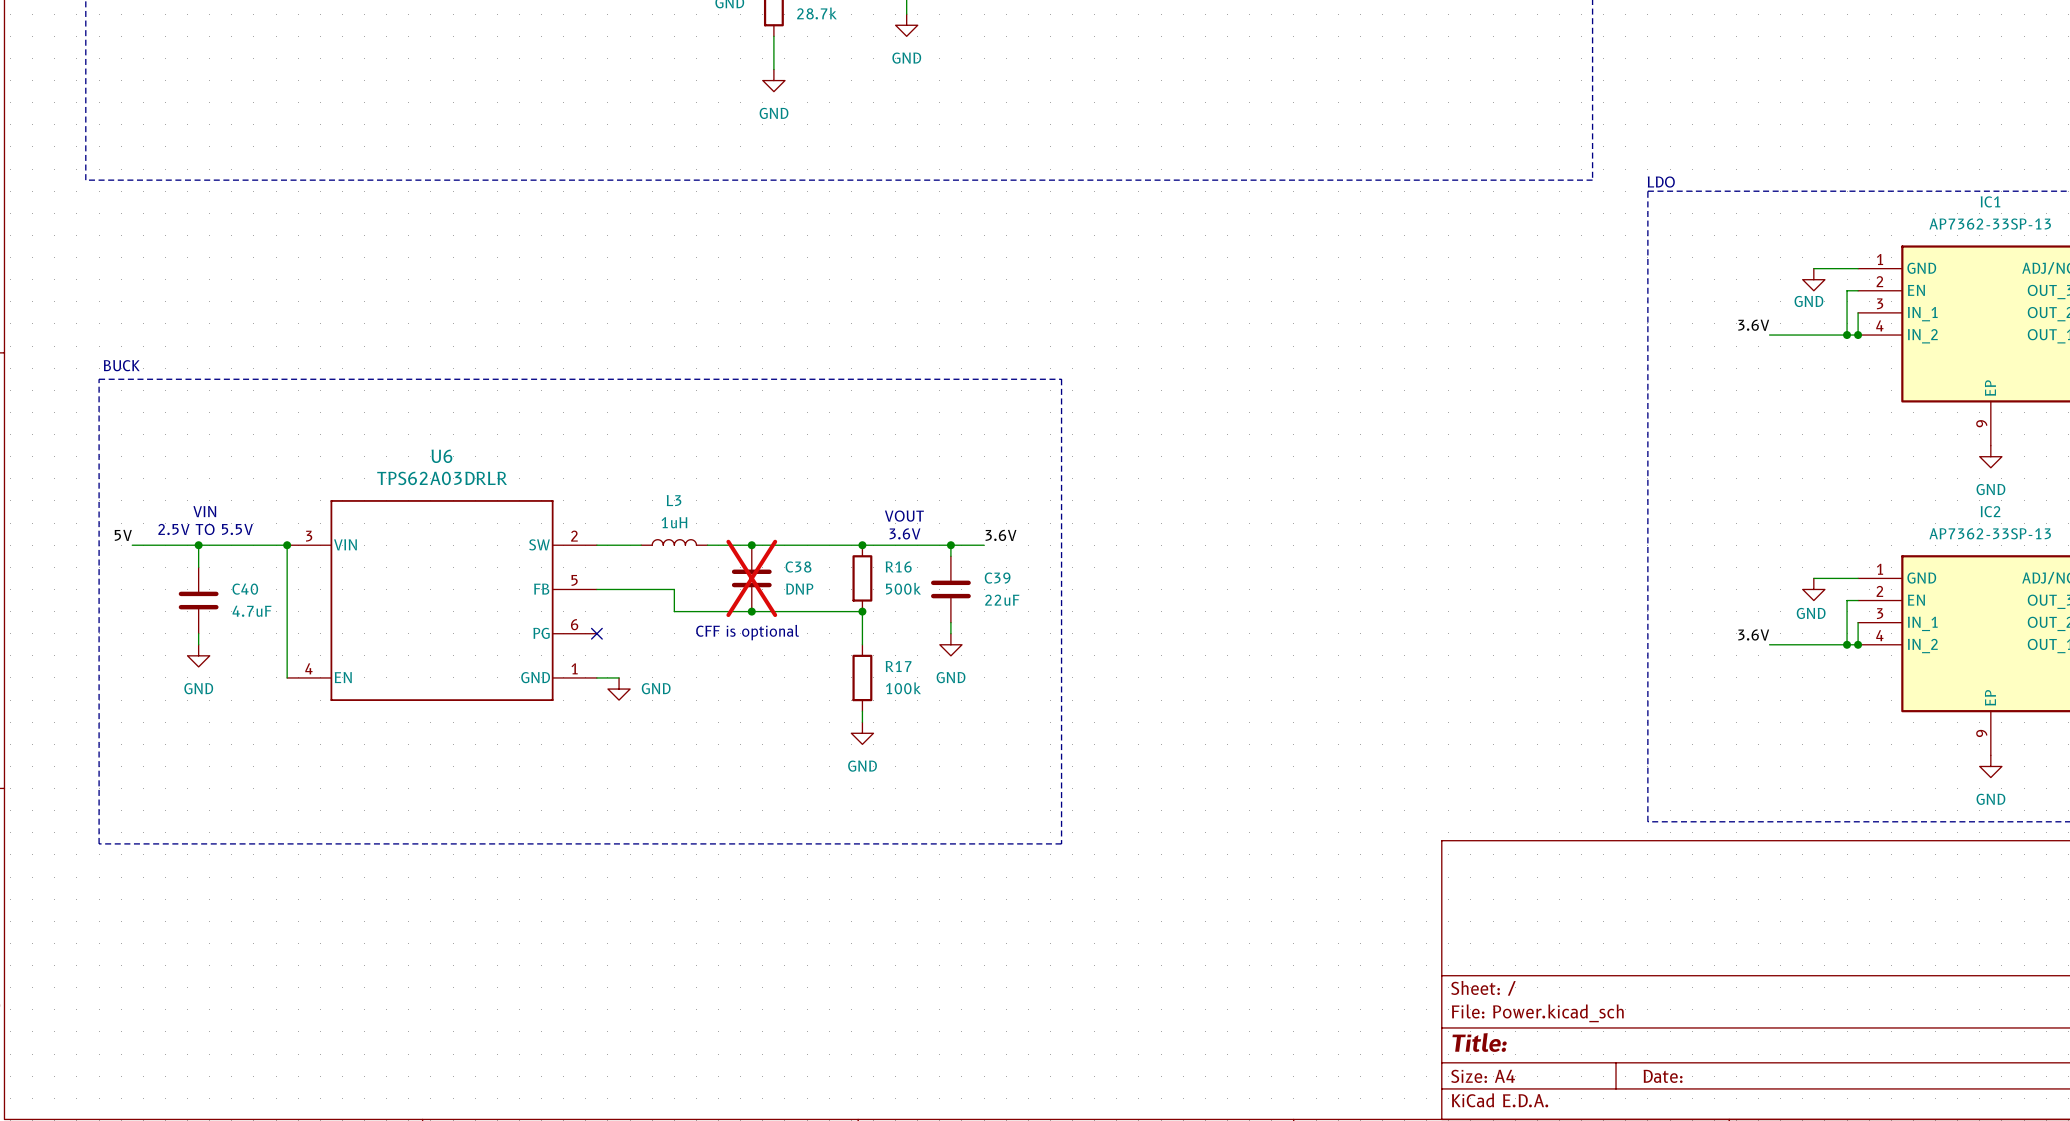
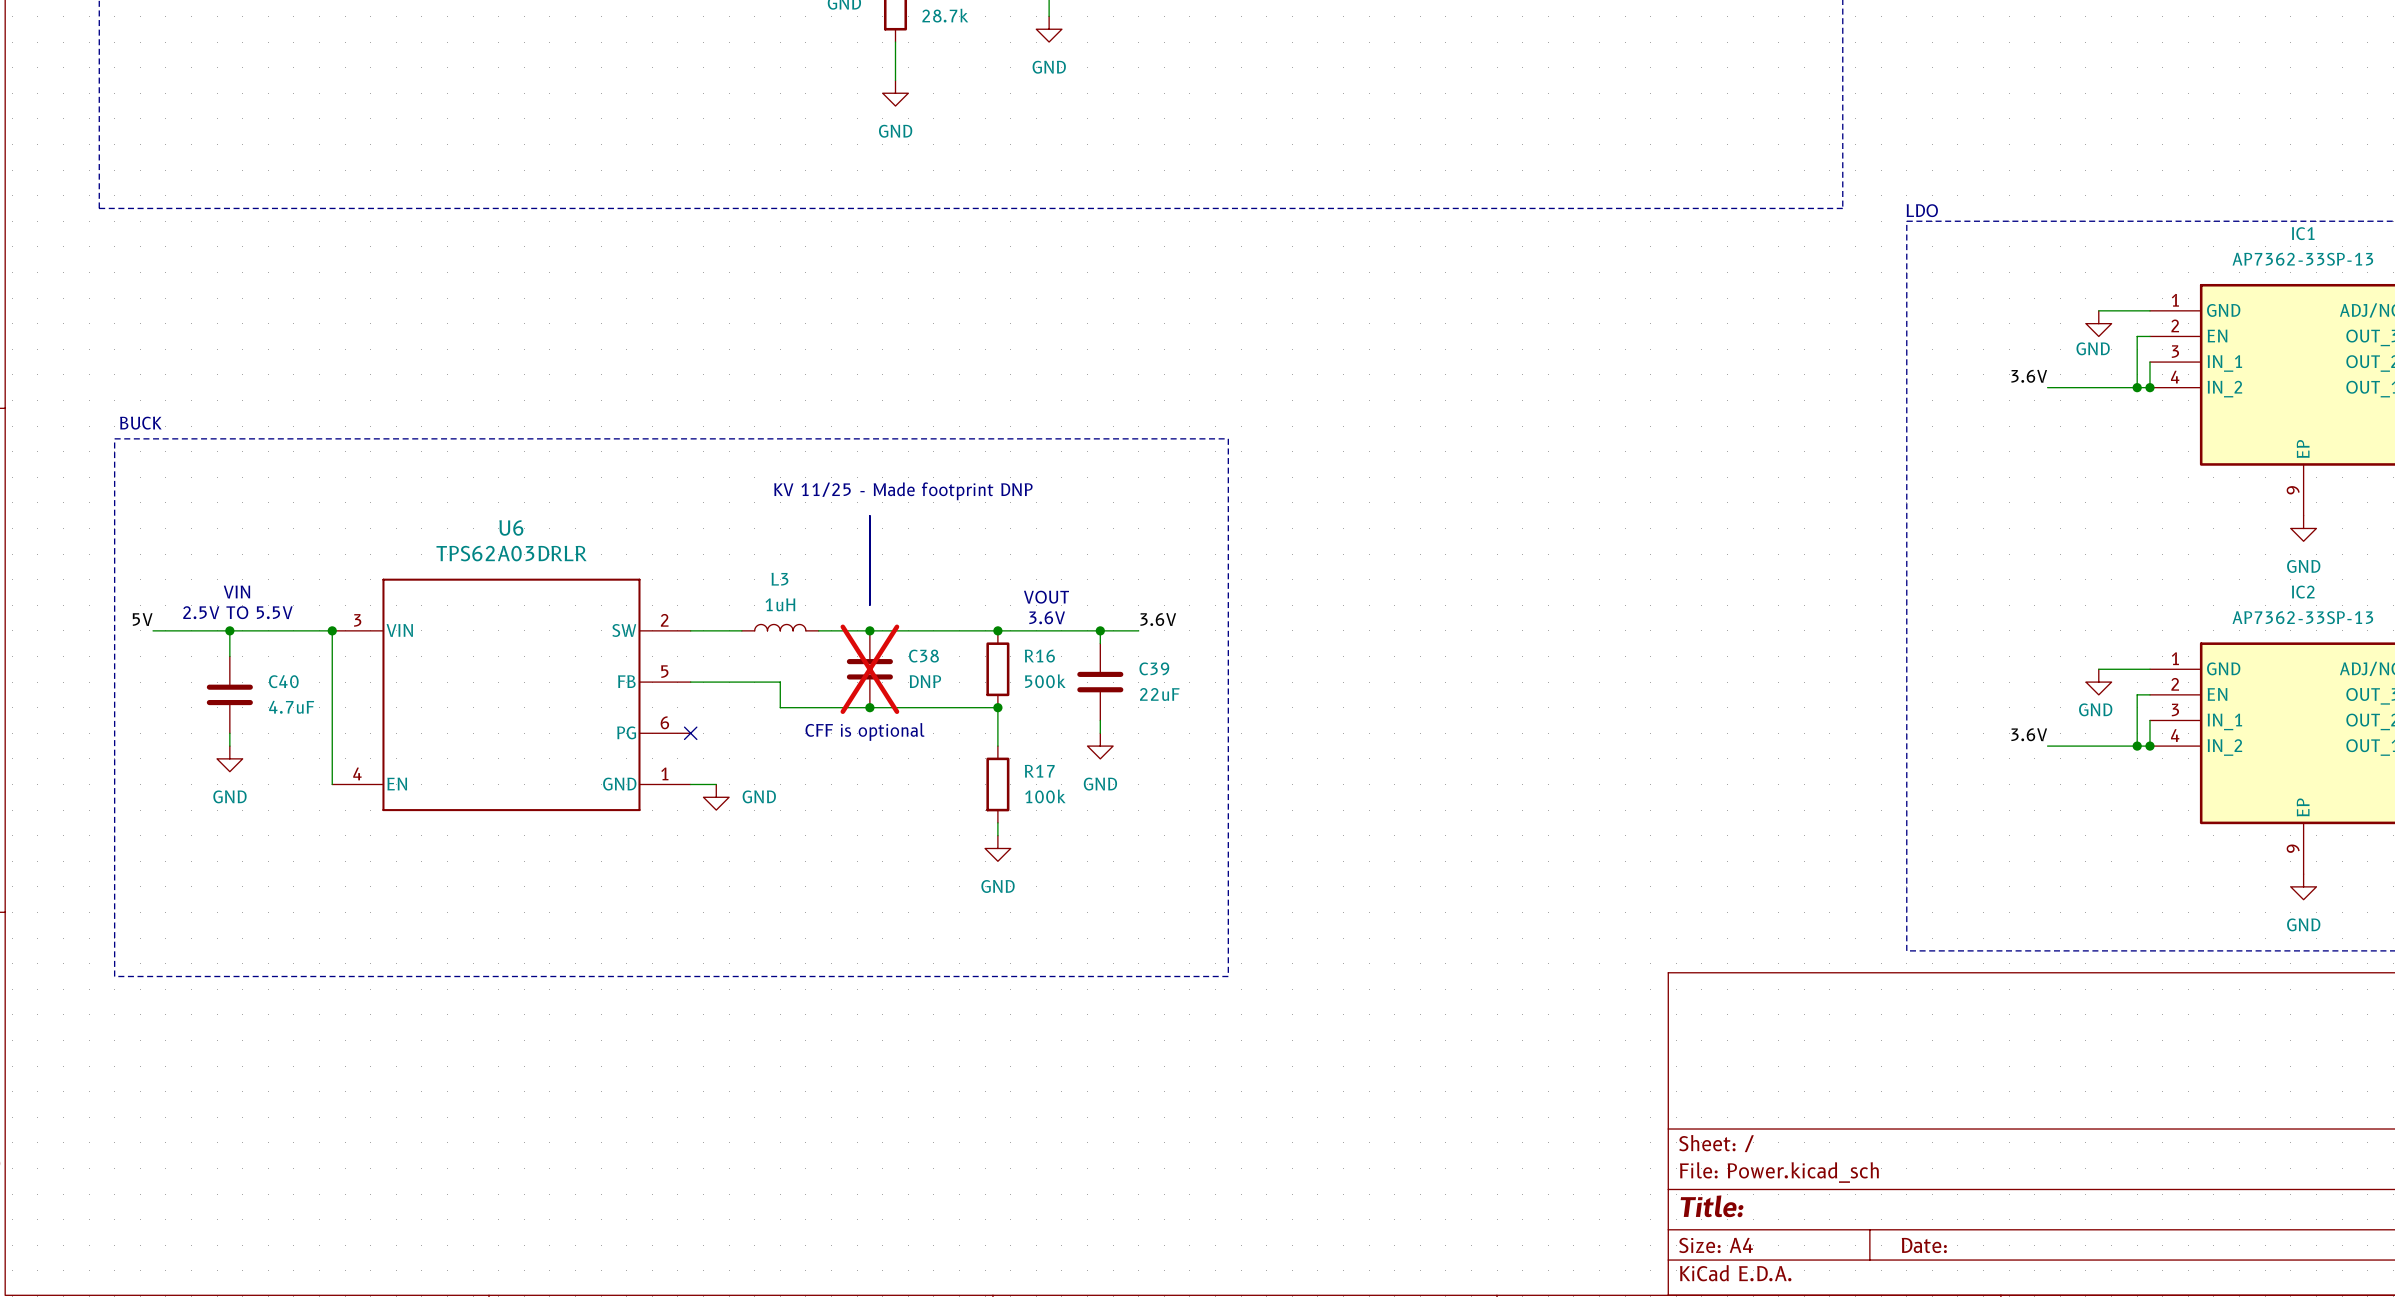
text: none -> KV 11/25 - Made footprint DNP (903, 491)
line: none -> (869, 515) (869, 605)

